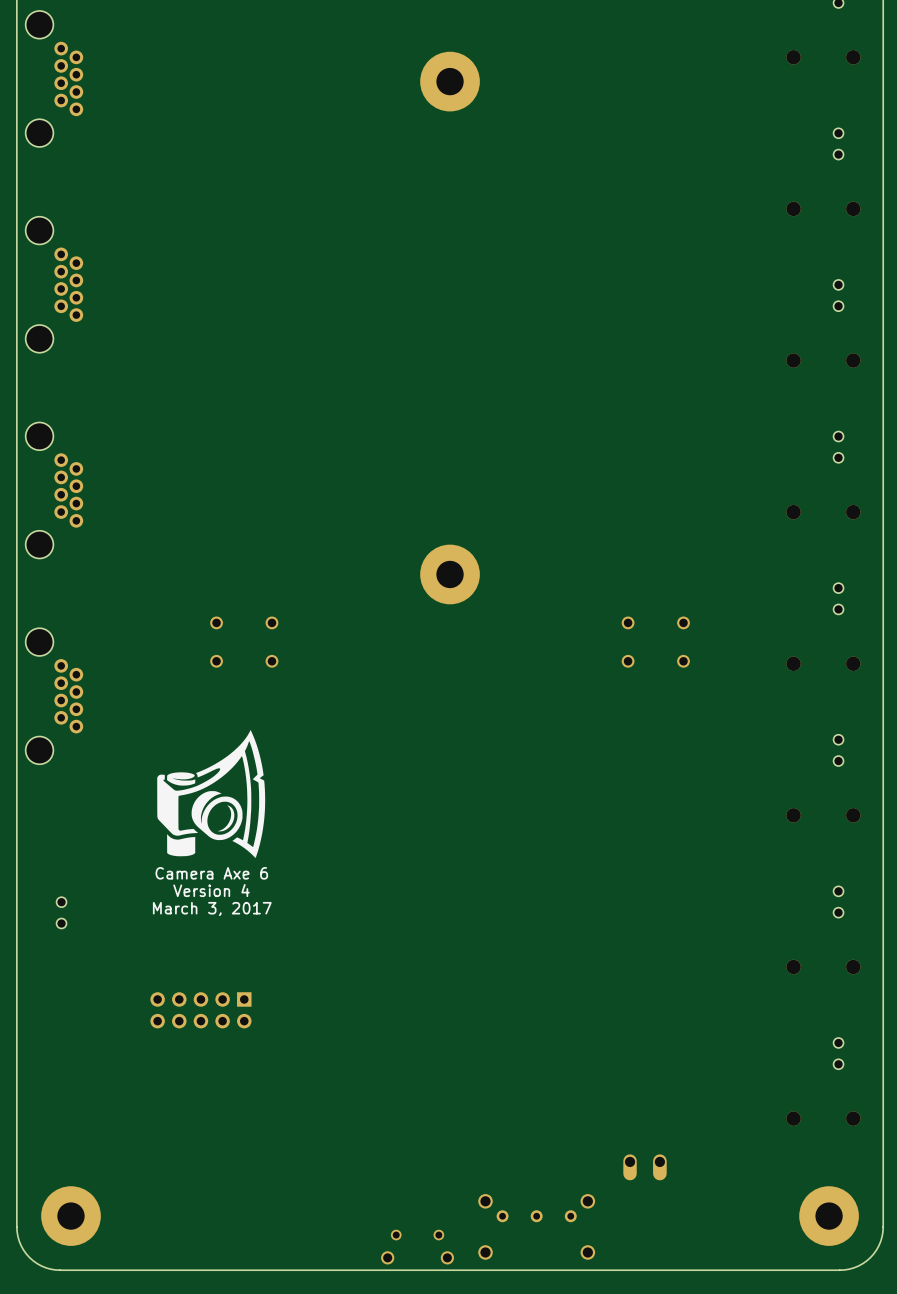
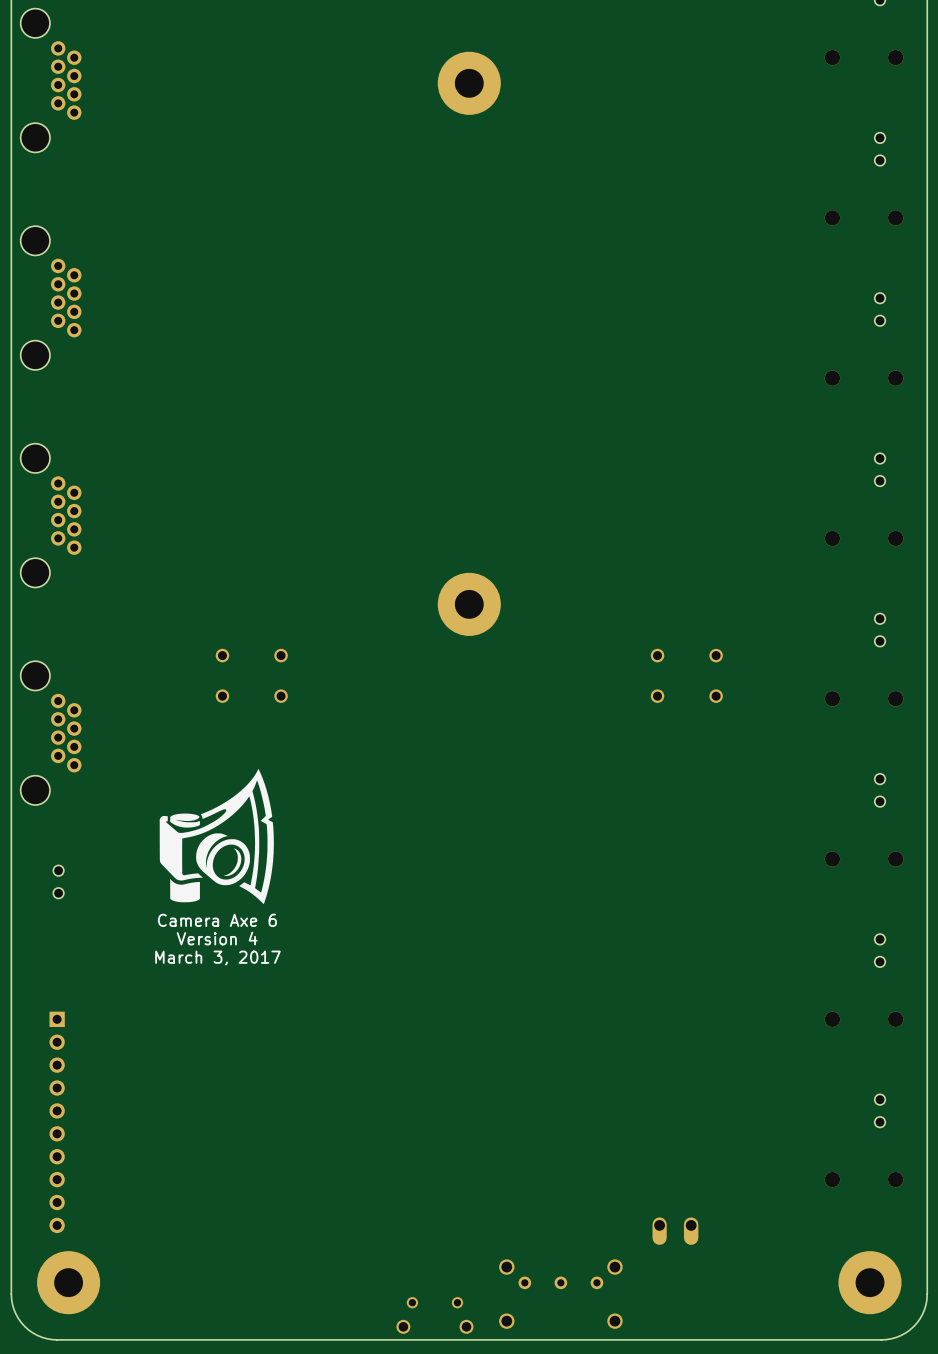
part position: (61, 912) -> (58, 881)
part: (200, 1010) -> none
part: none -> (57, 1122)

